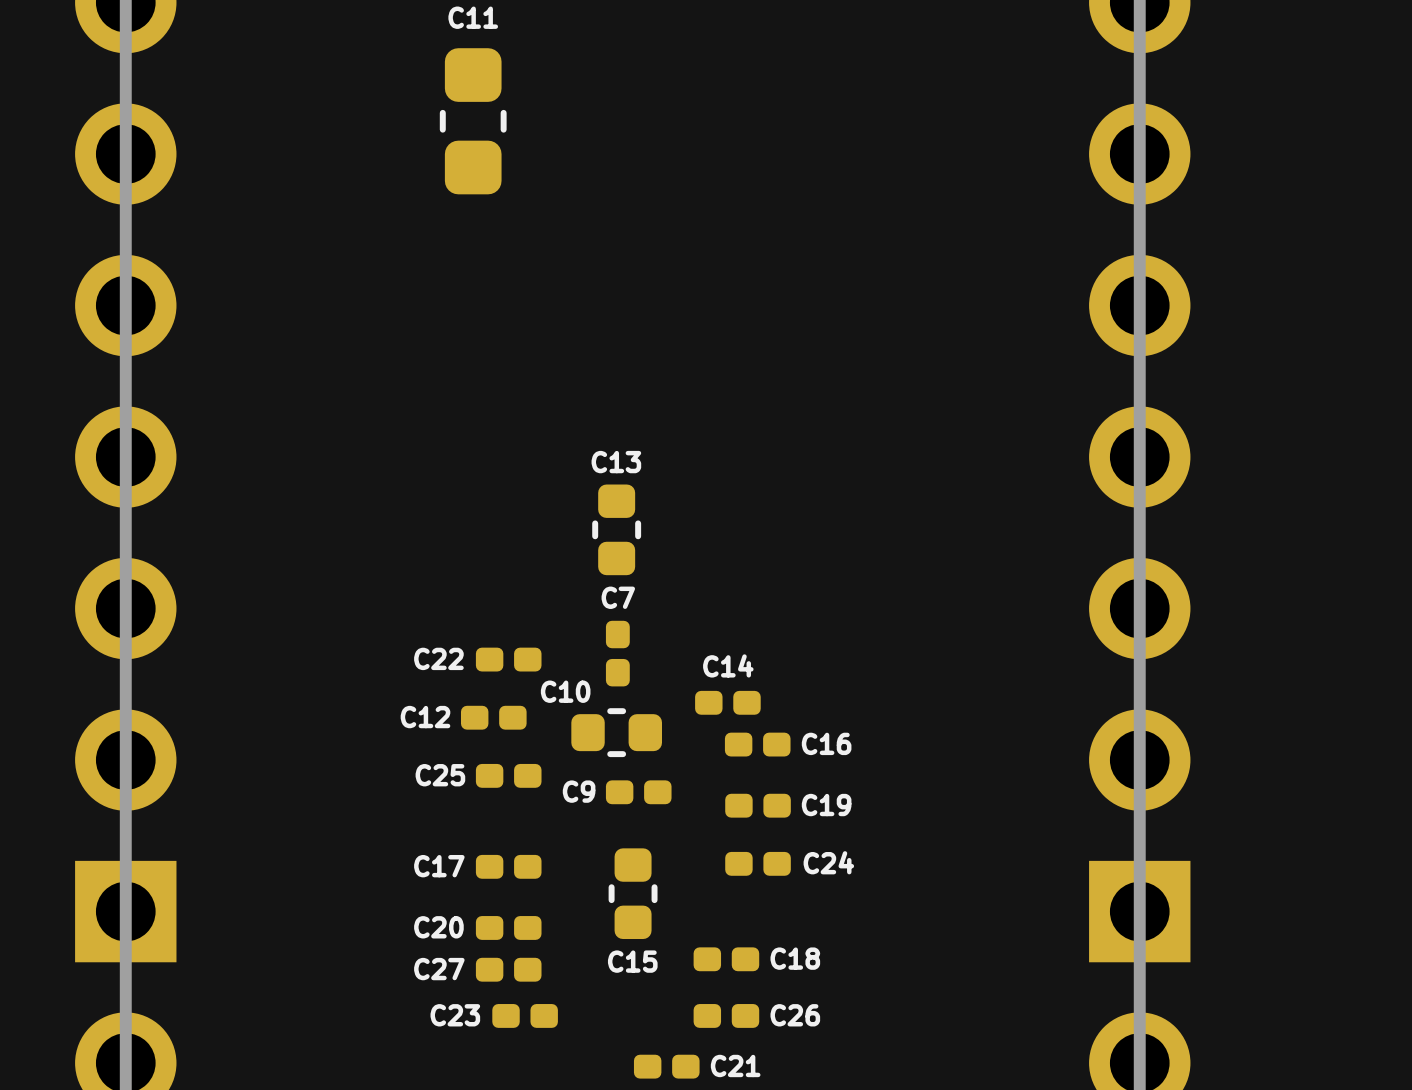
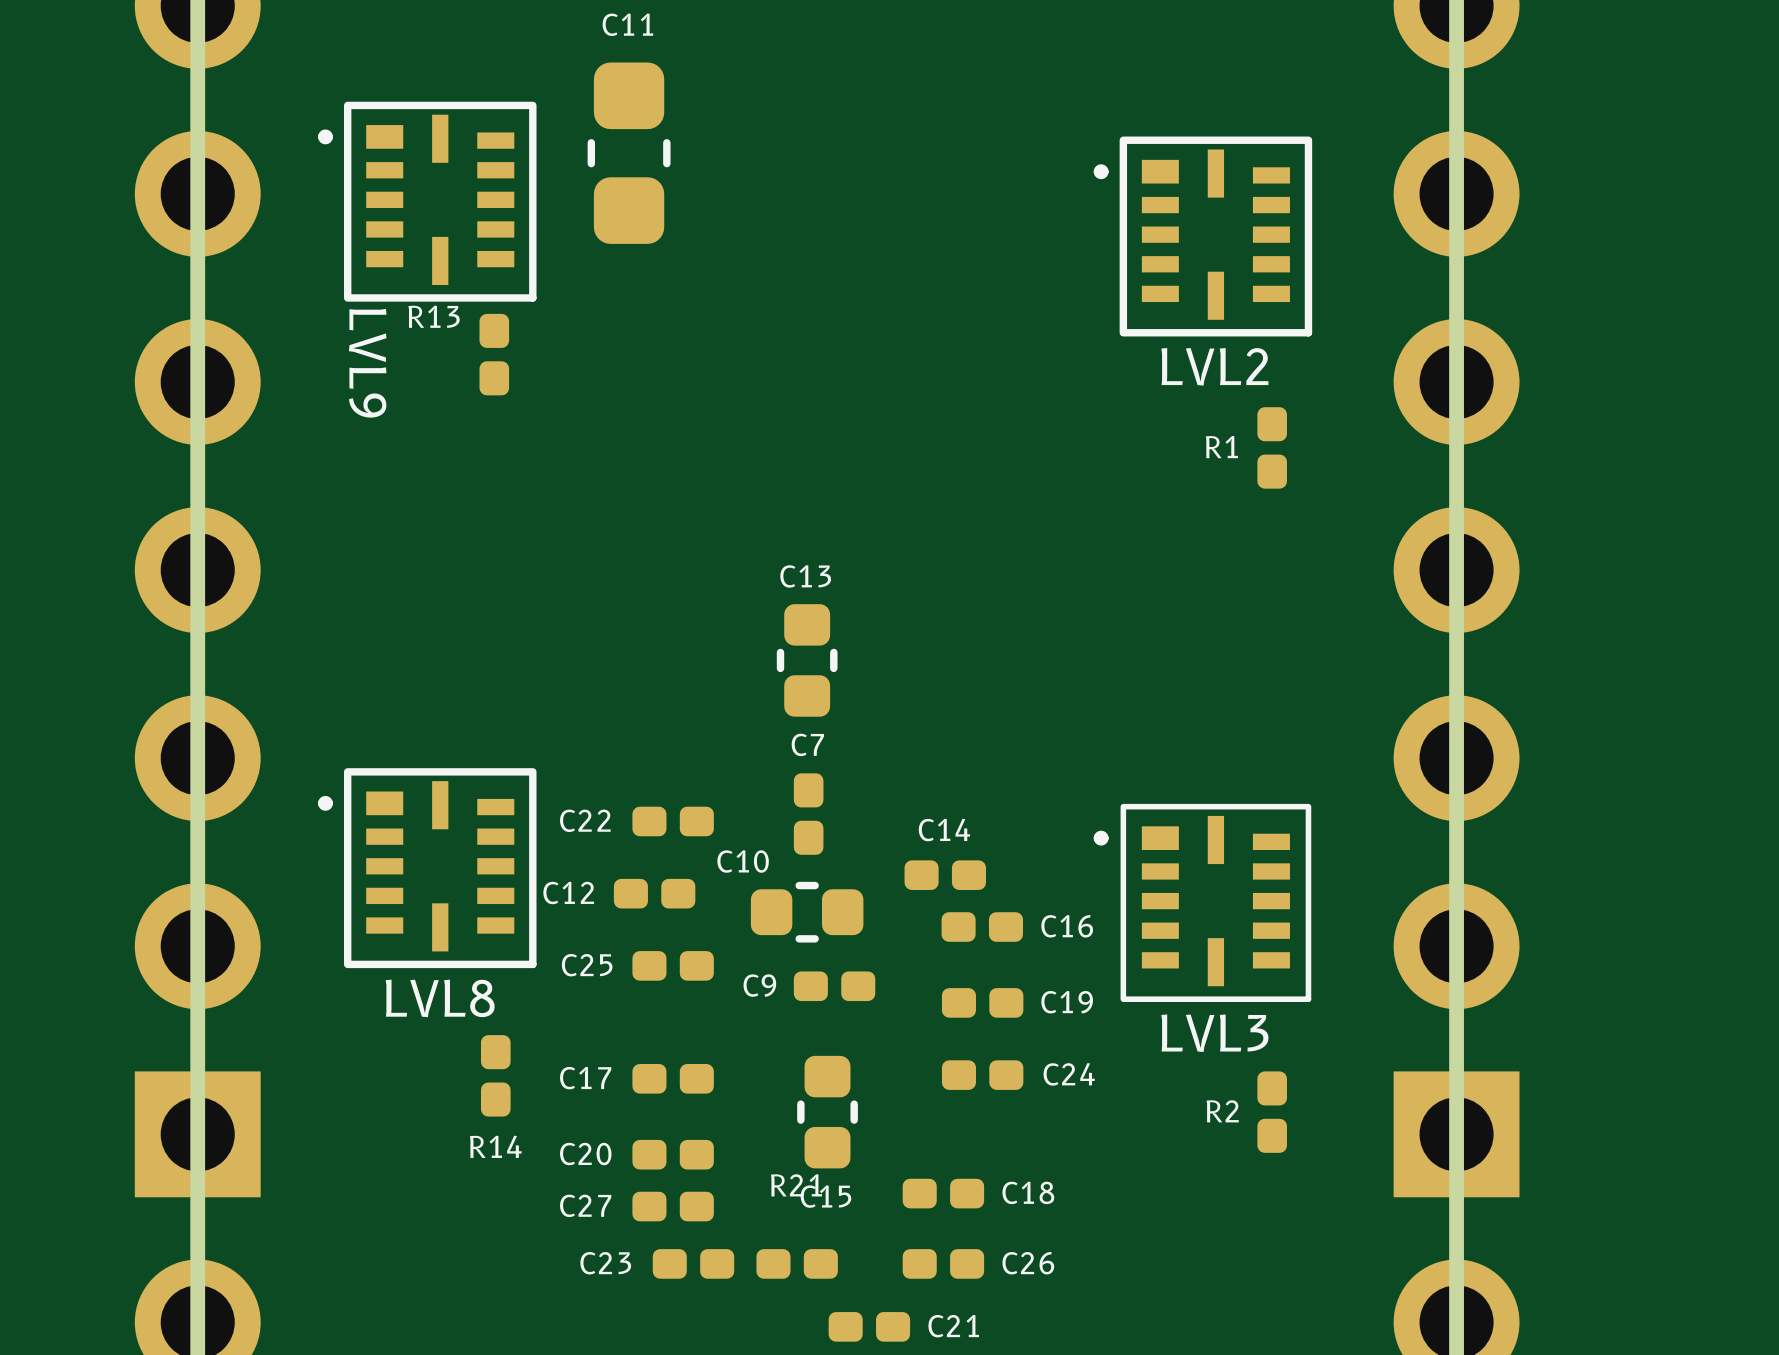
LVL9: none -> (427, 201)
LVL2: none -> (1202, 236)
R13: none -> (494, 354)
R1: none -> (1272, 447)
LVL8: none -> (427, 868)
LVL3: none -> (1202, 902)
R14: none -> (495, 1075)
R2: none -> (1272, 1112)
R21: none -> (797, 1263)

